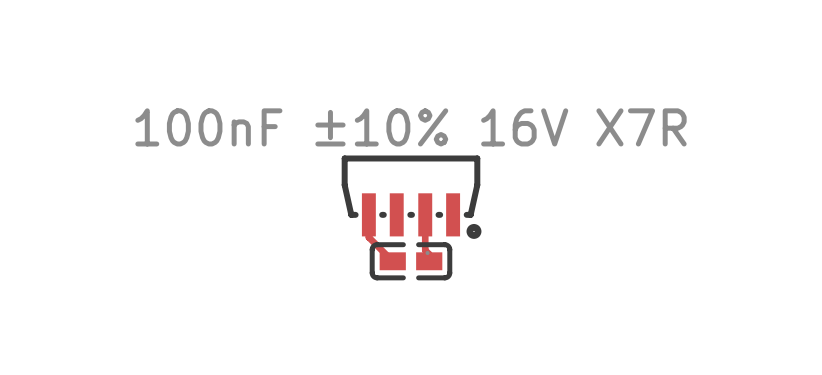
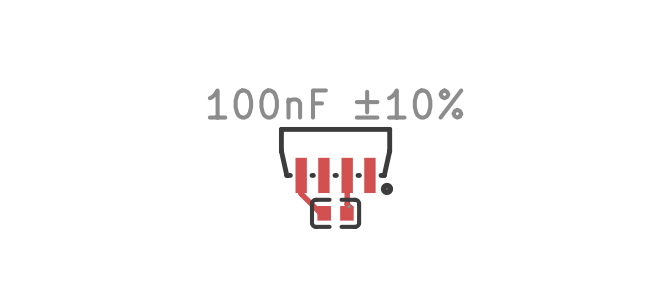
part value: 100nF ±10% 16V X7R (410, 127) -> 100nF ±10% (335, 104)
part footprint: [369, 242, 453, 281] -> [309, 197, 362, 229]

